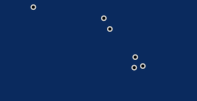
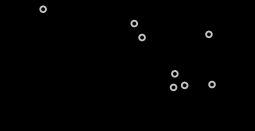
via: none -> (208, 34)
via: none -> (212, 84)

